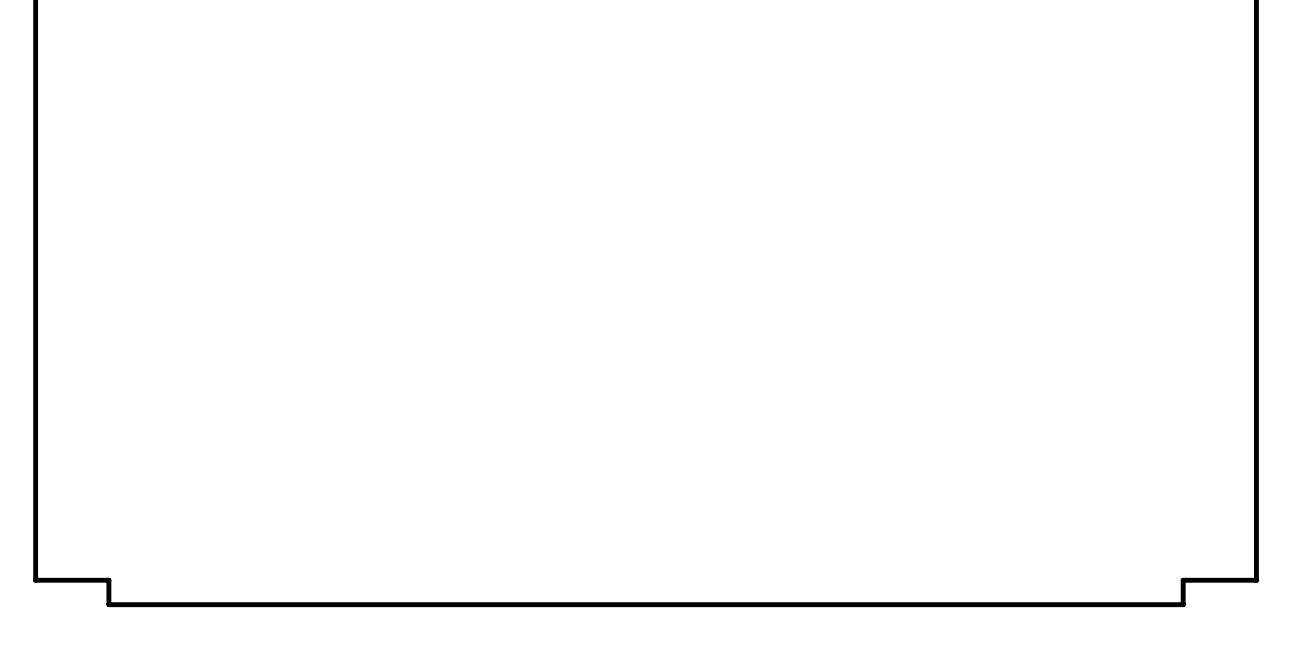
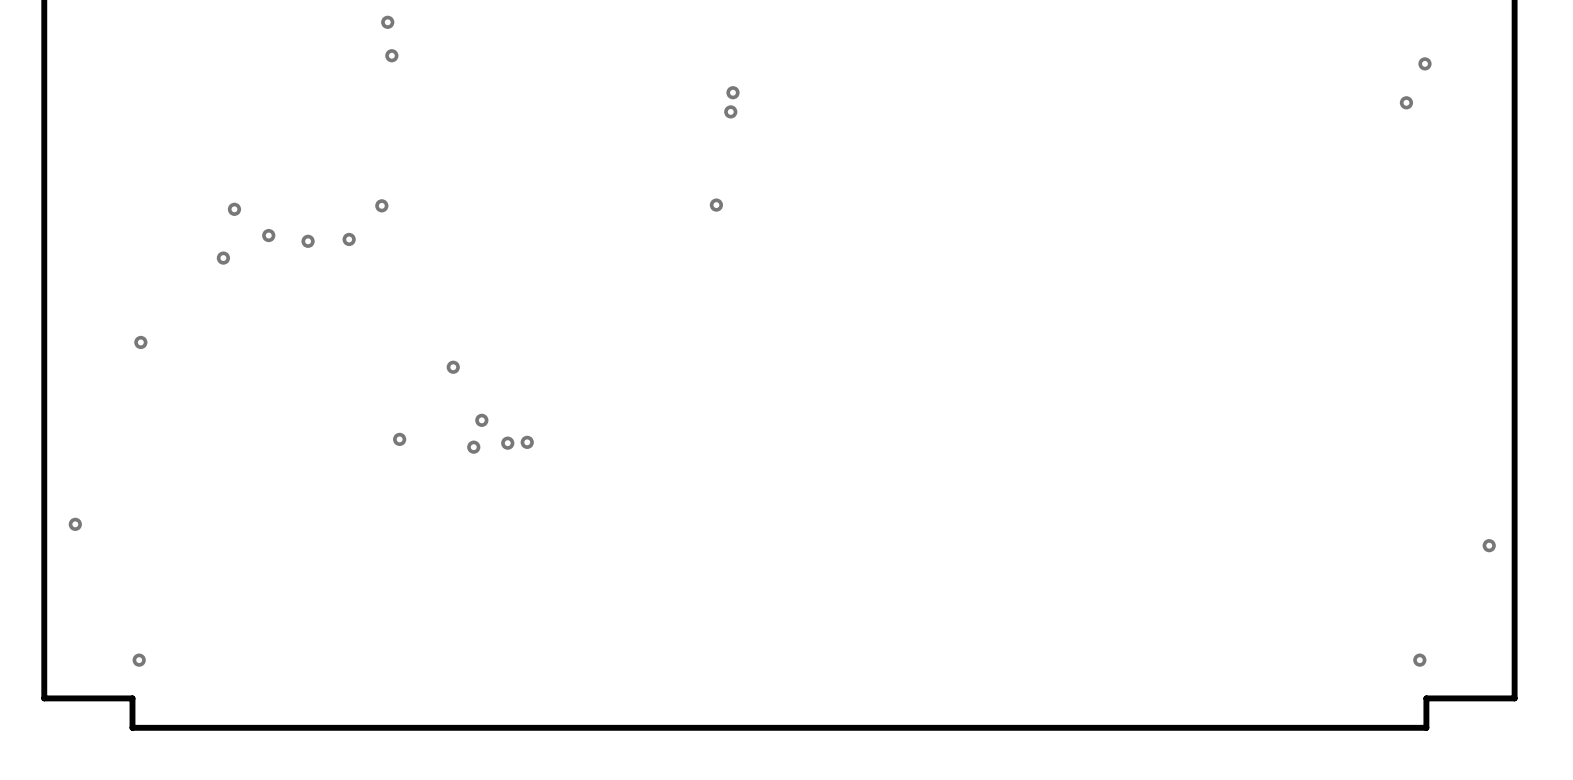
via: none -> (387, 22)
via: none -> (391, 55)
via: none -> (1424, 63)
via: none -> (732, 92)
via: none -> (1406, 102)
via: none -> (730, 111)
via: none -> (716, 205)
via: none -> (381, 205)
via: none -> (234, 209)
via: none -> (268, 235)
via: none -> (349, 239)
via: none -> (308, 241)
via: none -> (223, 258)
via: none -> (140, 342)
via: none -> (453, 367)
via: none -> (481, 420)
via: none -> (399, 439)
via: none -> (527, 442)
via: none -> (507, 443)
via: none -> (473, 447)
via: none -> (75, 524)
via: none -> (1489, 545)
via: none -> (139, 660)
via: none -> (1419, 660)

